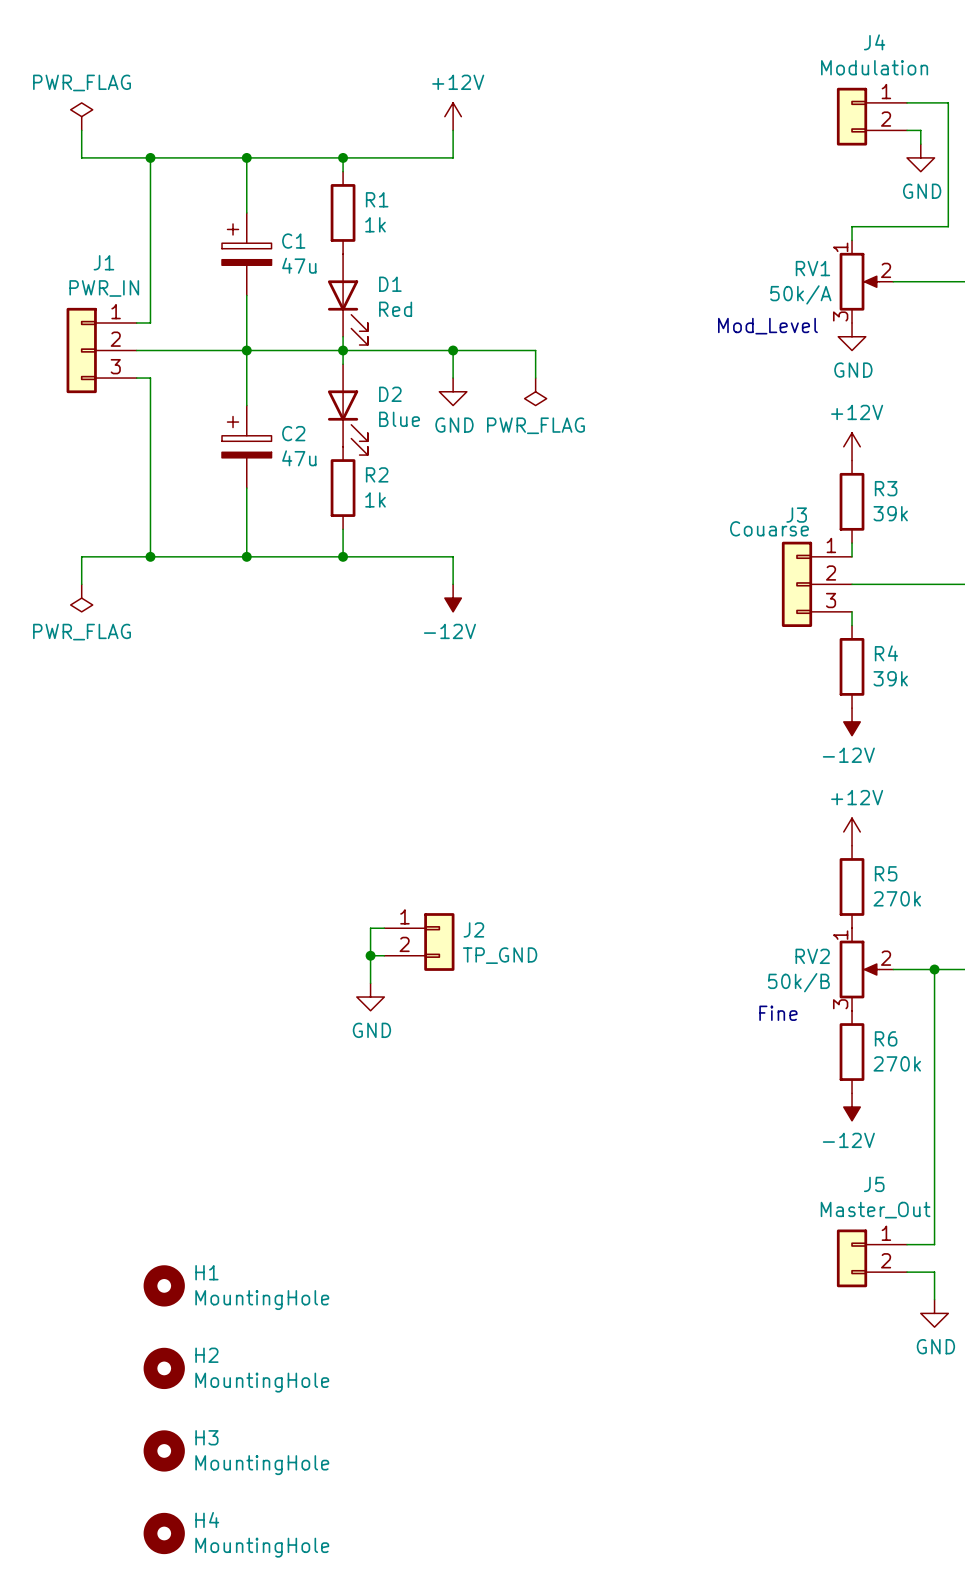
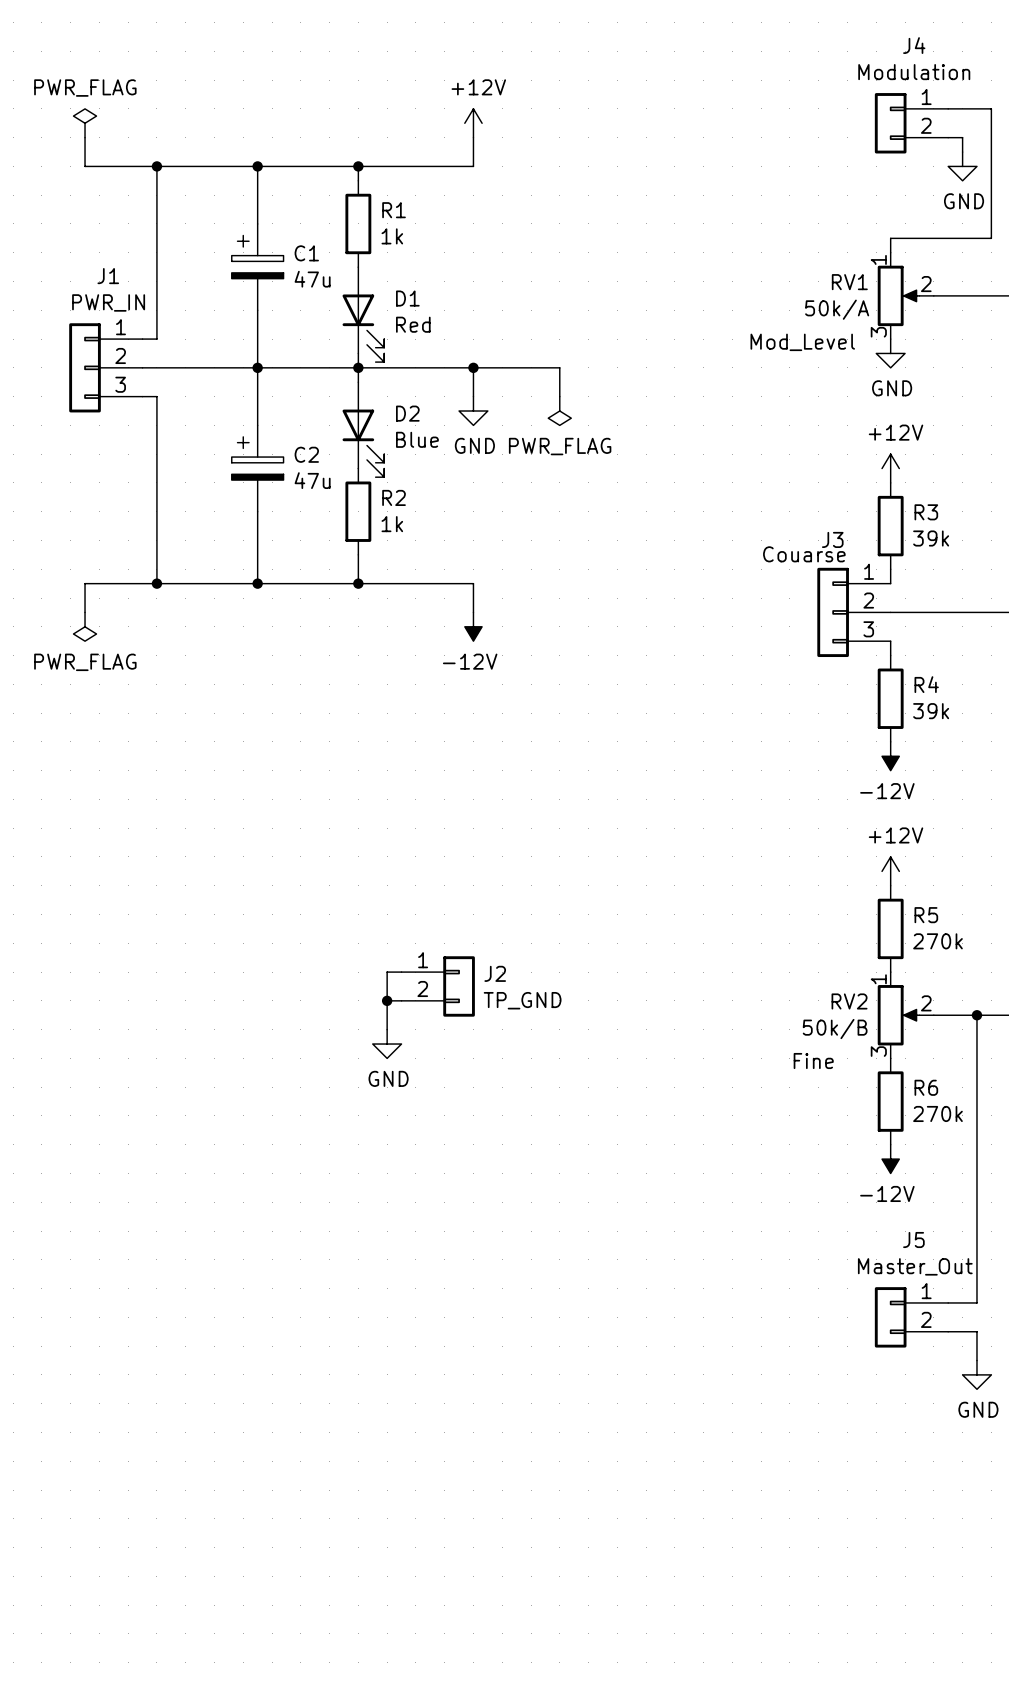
H1: MountingHole (164, 1285) -> none
H2: MountingHole (164, 1368) -> none
H3: MountingHole (164, 1450) -> none
H4: MountingHole (164, 1533) -> none

